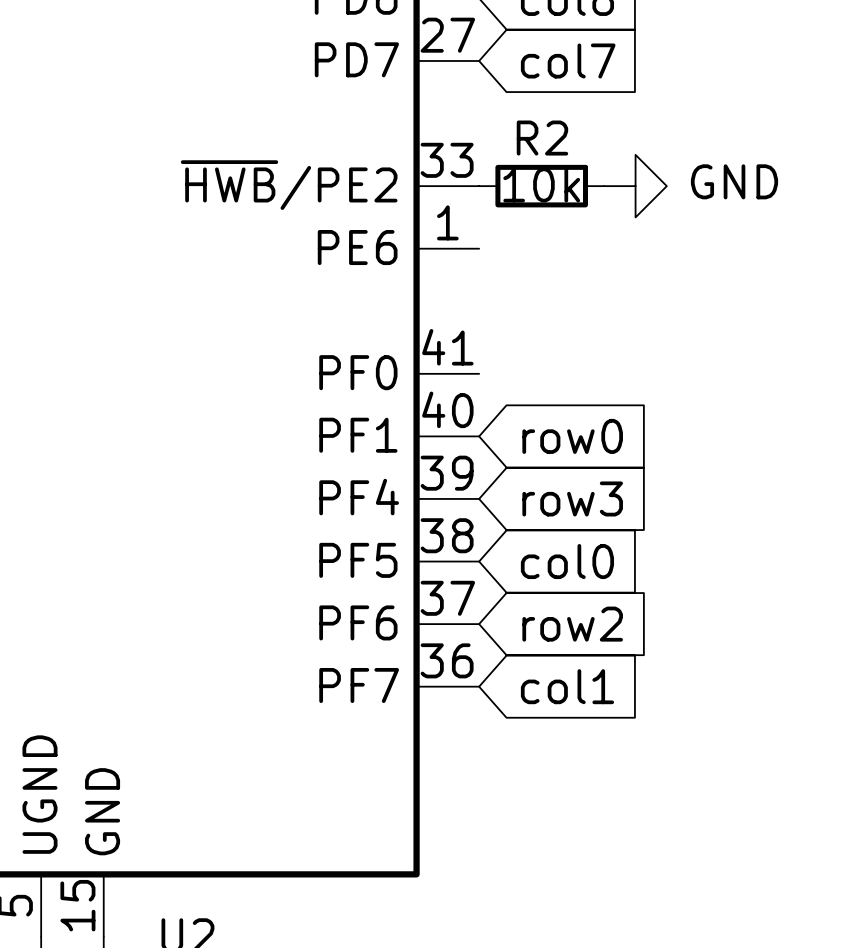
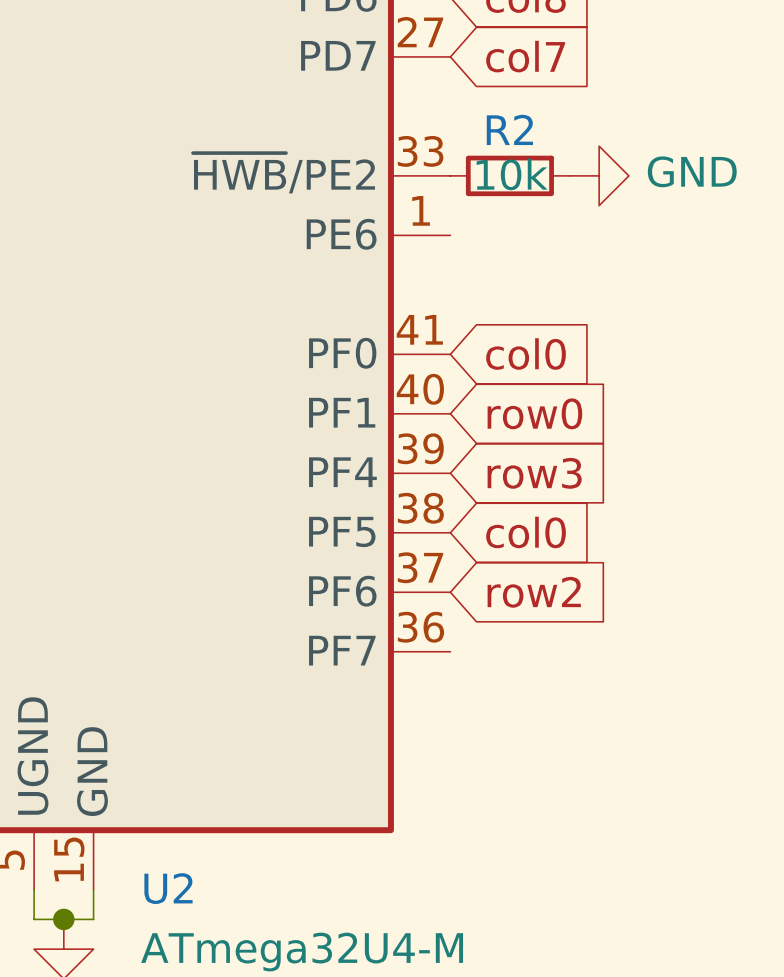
global label: none -> col0 (526, 354)
global label: col1 (567, 686) -> none

